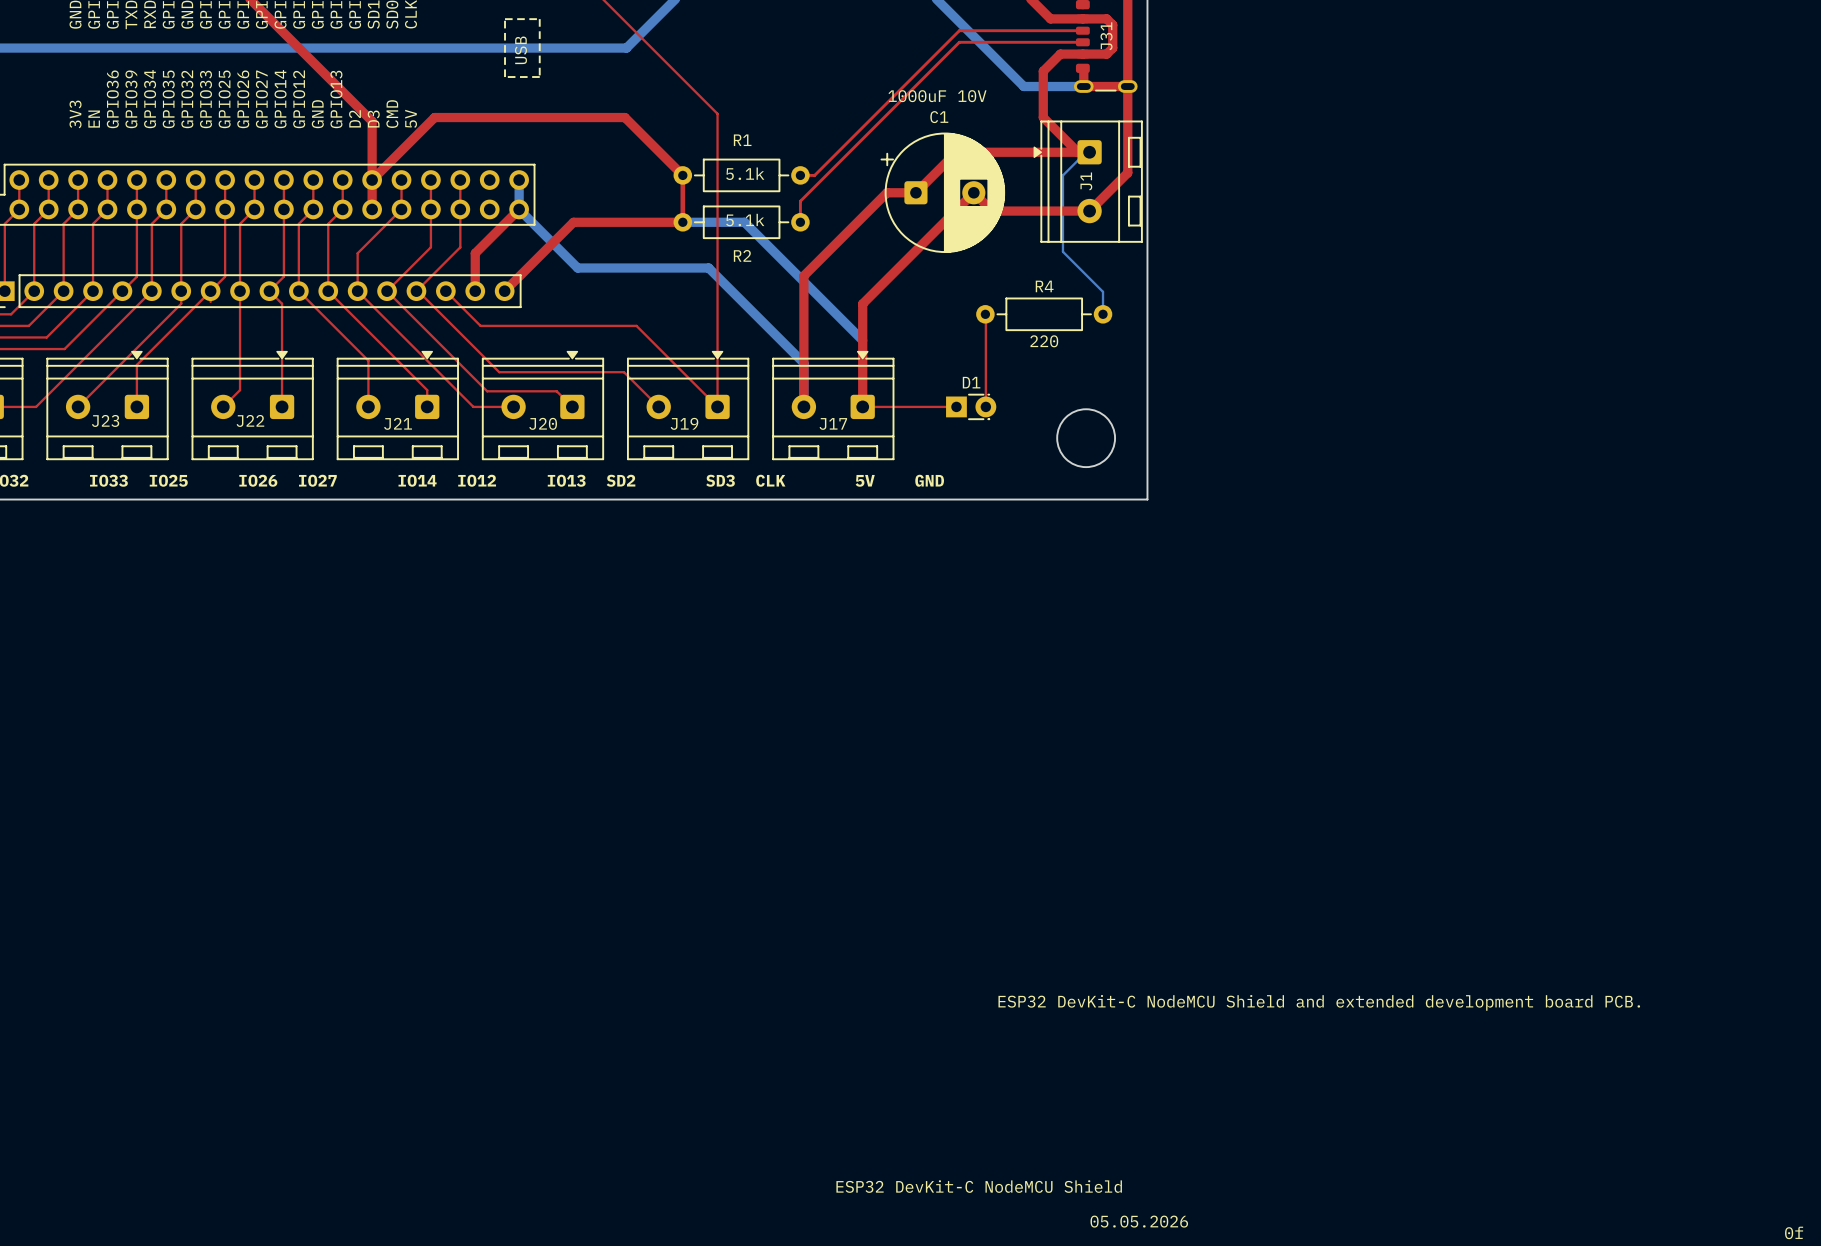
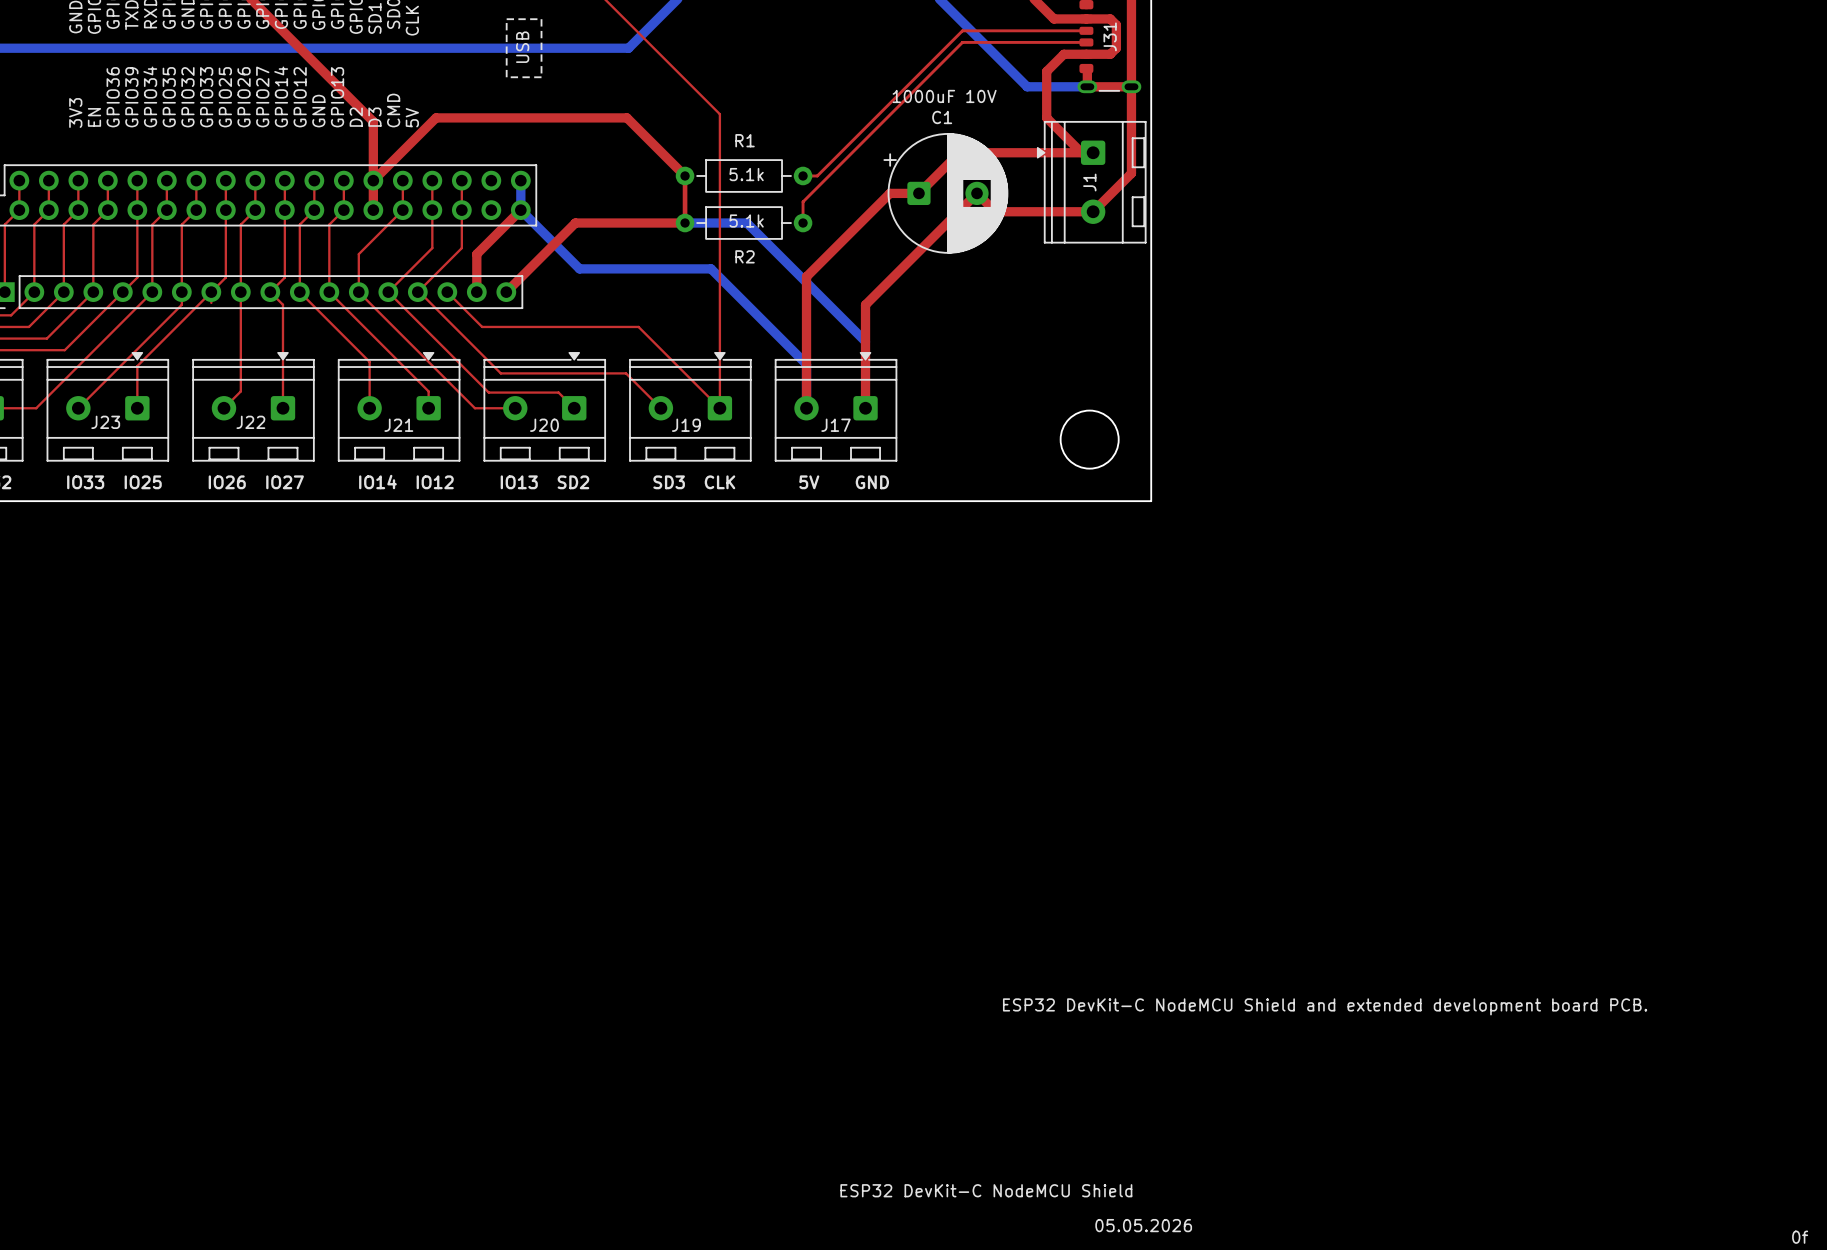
bottom track: (1089, 152) (1086, 152) (1062, 175) (1062, 251) (1103, 291) (1103, 314) -> none
top track: (985, 314) (985, 406) -> none
R4: 220 (1044, 314) -> none
top track: (862, 406) (956, 406) -> none
D1: (971, 406) -> none

